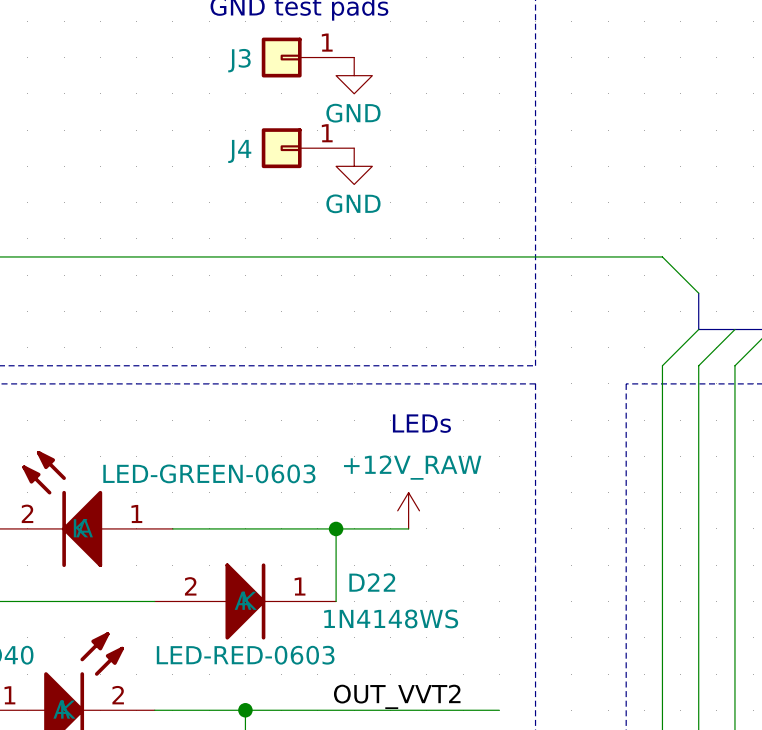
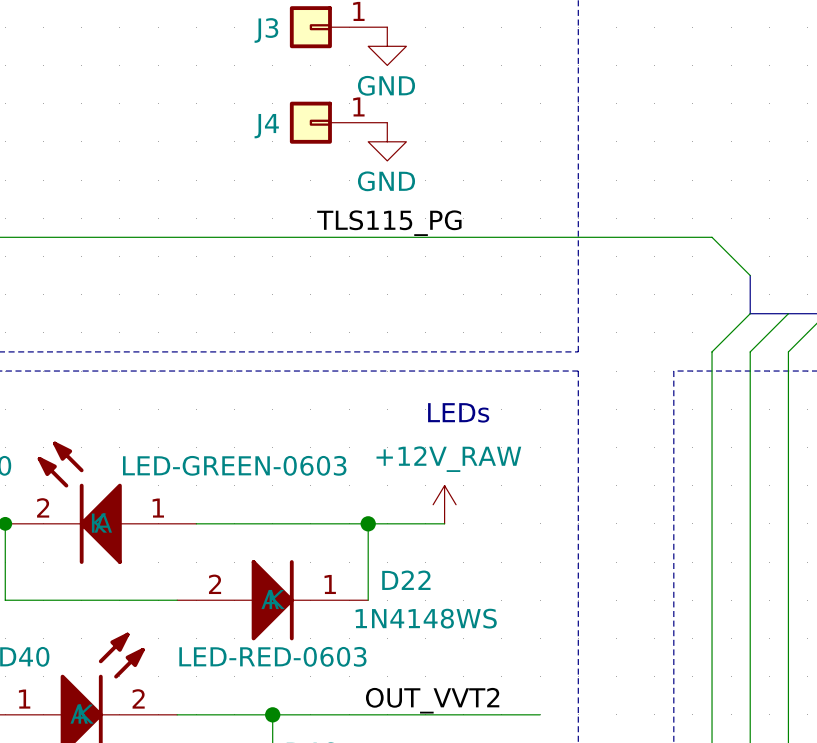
label: none -> TLS115_PG (389, 223)

